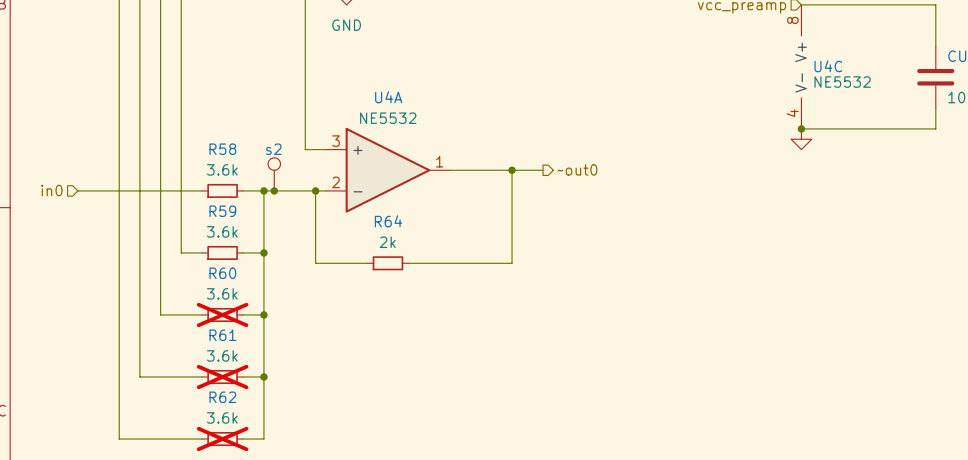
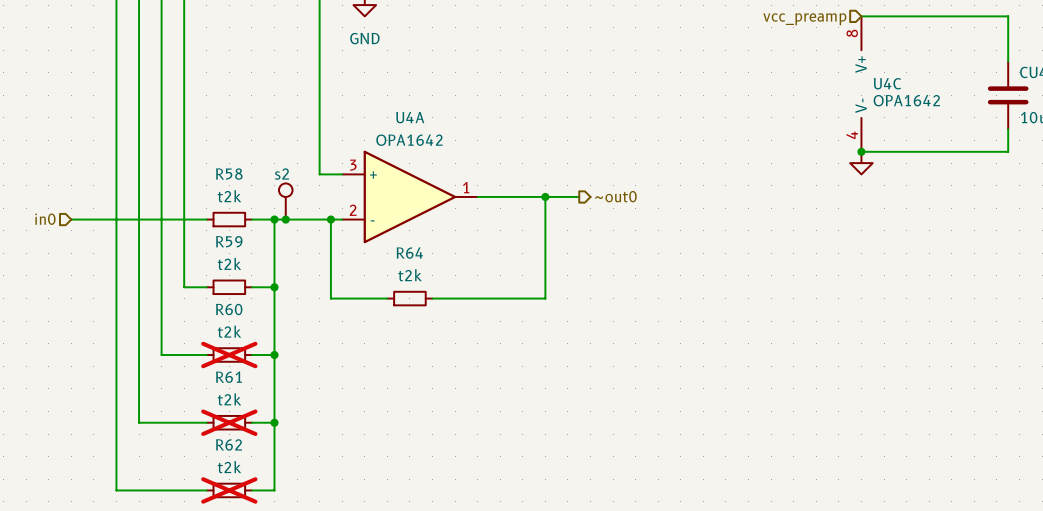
U4C value: NE5532 (842, 82) -> OPA1642 (906, 100)
U4A value: NE5532 (388, 118) -> OPA1642 (409, 140)
R58 value: 3.6k (222, 169) -> t2k (229, 196)
R59 value: 3.6k (222, 231) -> t2k (229, 263)
R64 value: 2k (387, 242) -> t2k (410, 275)
R60 value: 3.6k (222, 293) -> t2k (229, 331)
R61 value: 3.6k (222, 355) -> t2k (229, 399)
R62 value: 3.6k (222, 417) -> t2k (229, 467)

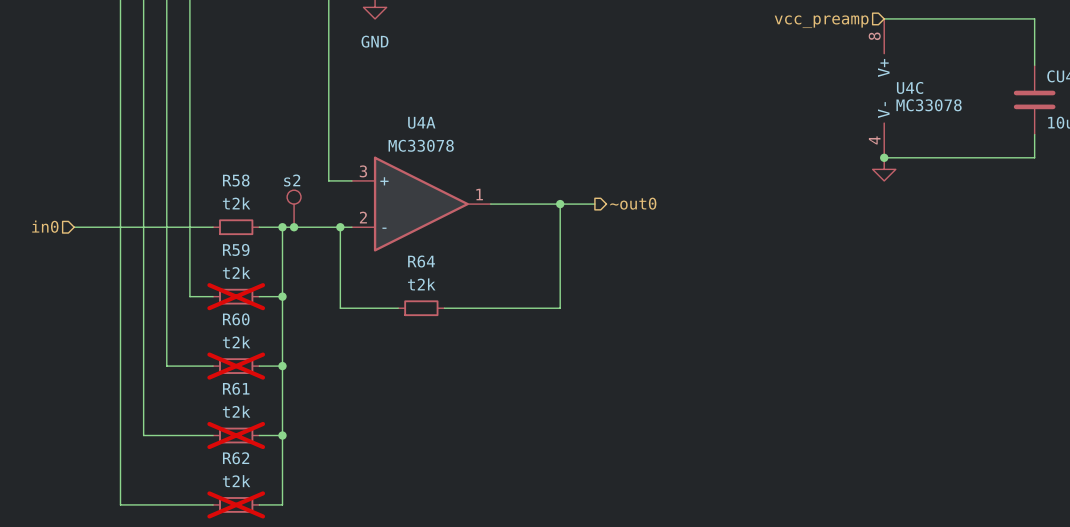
U4C value: OPA1642 (906, 100) -> MC33078 (929, 105)
U4A value: OPA1642 (409, 140) -> MC33078 (421, 145)
R59 do-not-place cross: none -> (236, 296)

